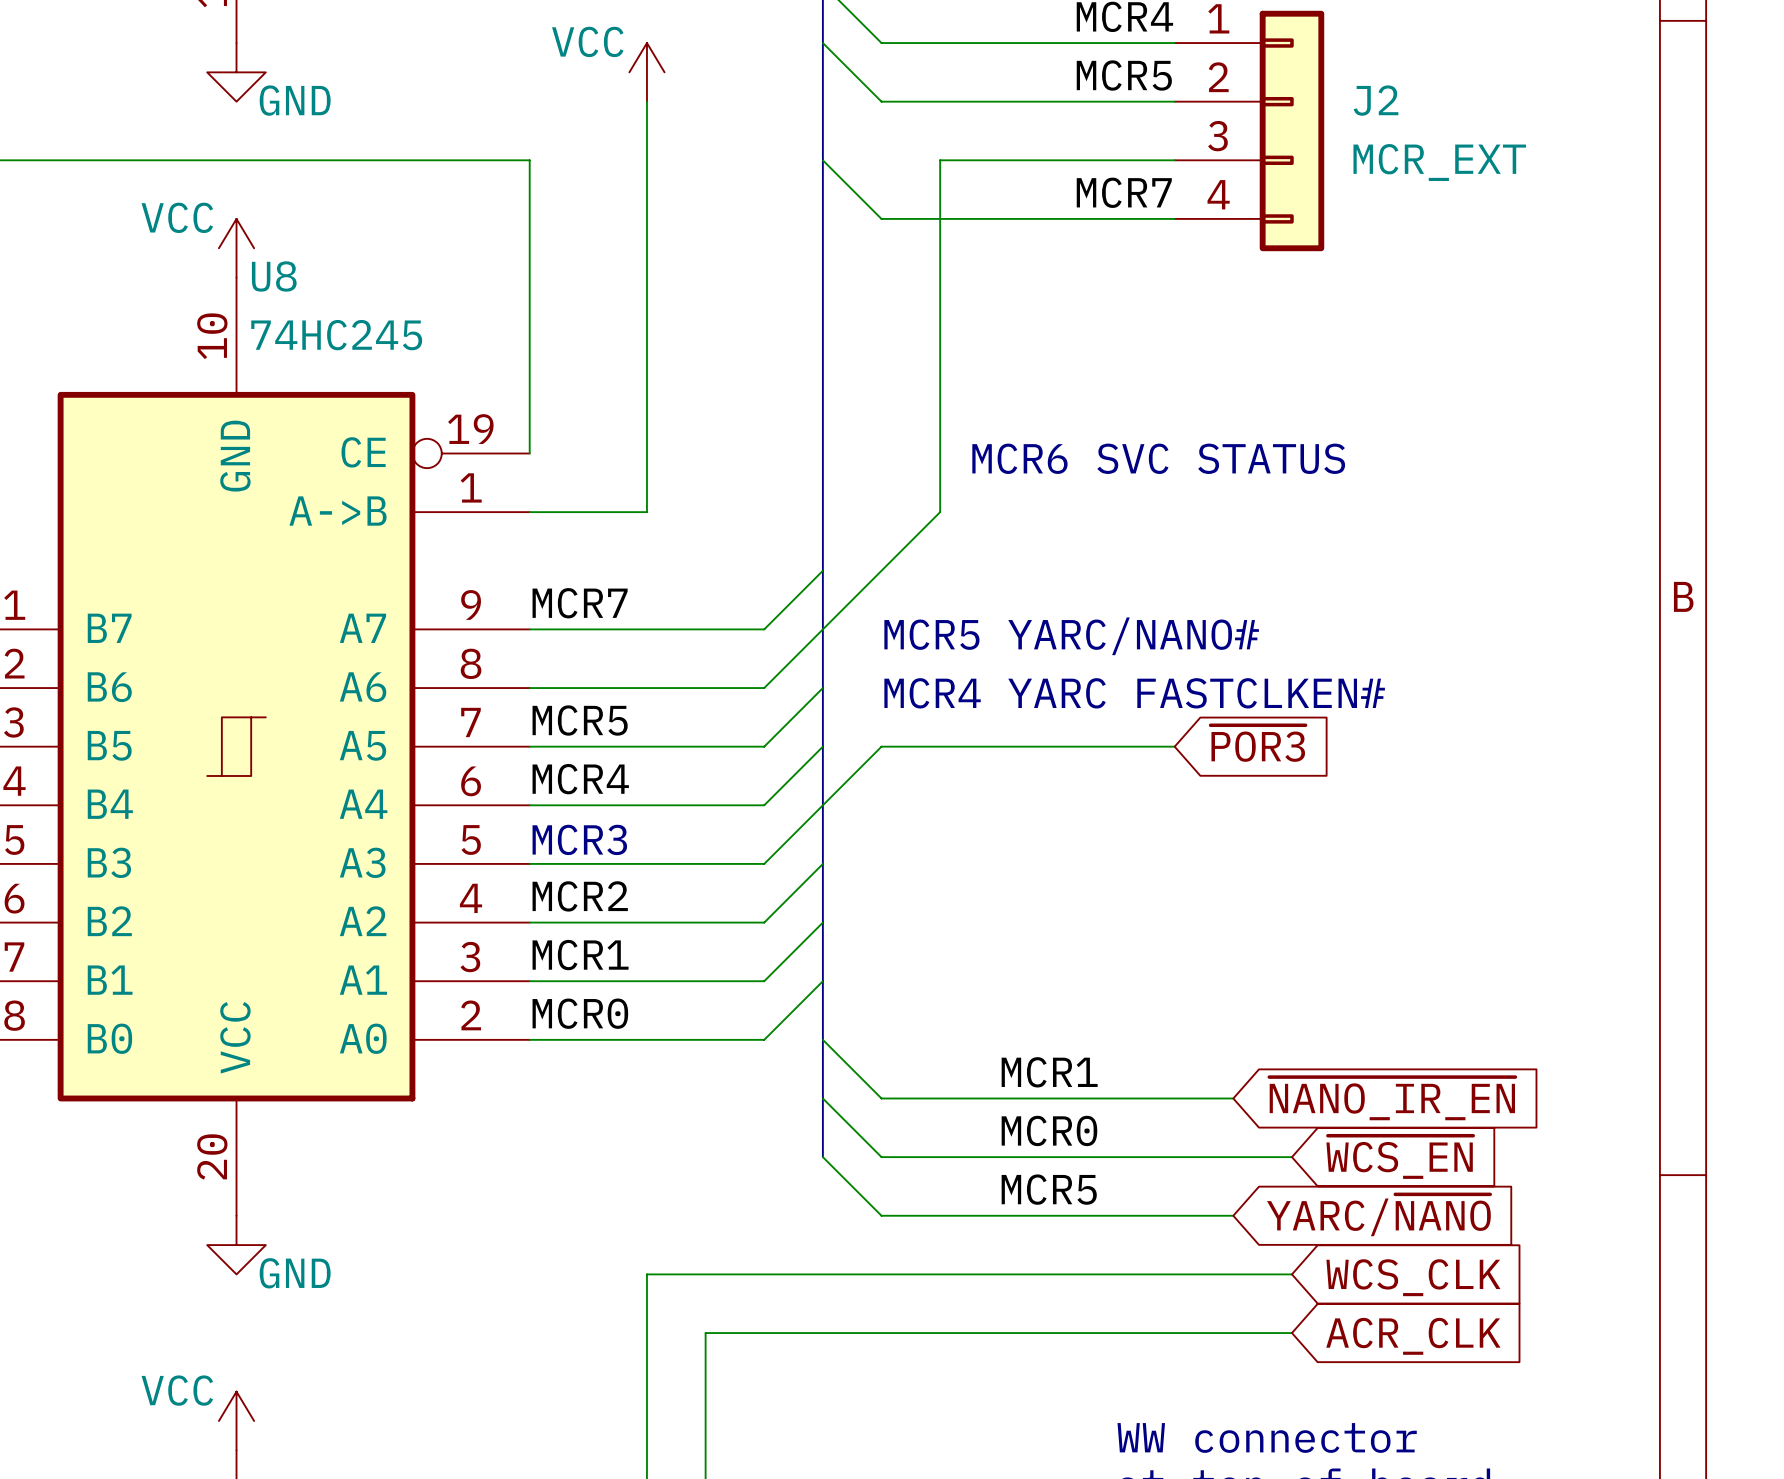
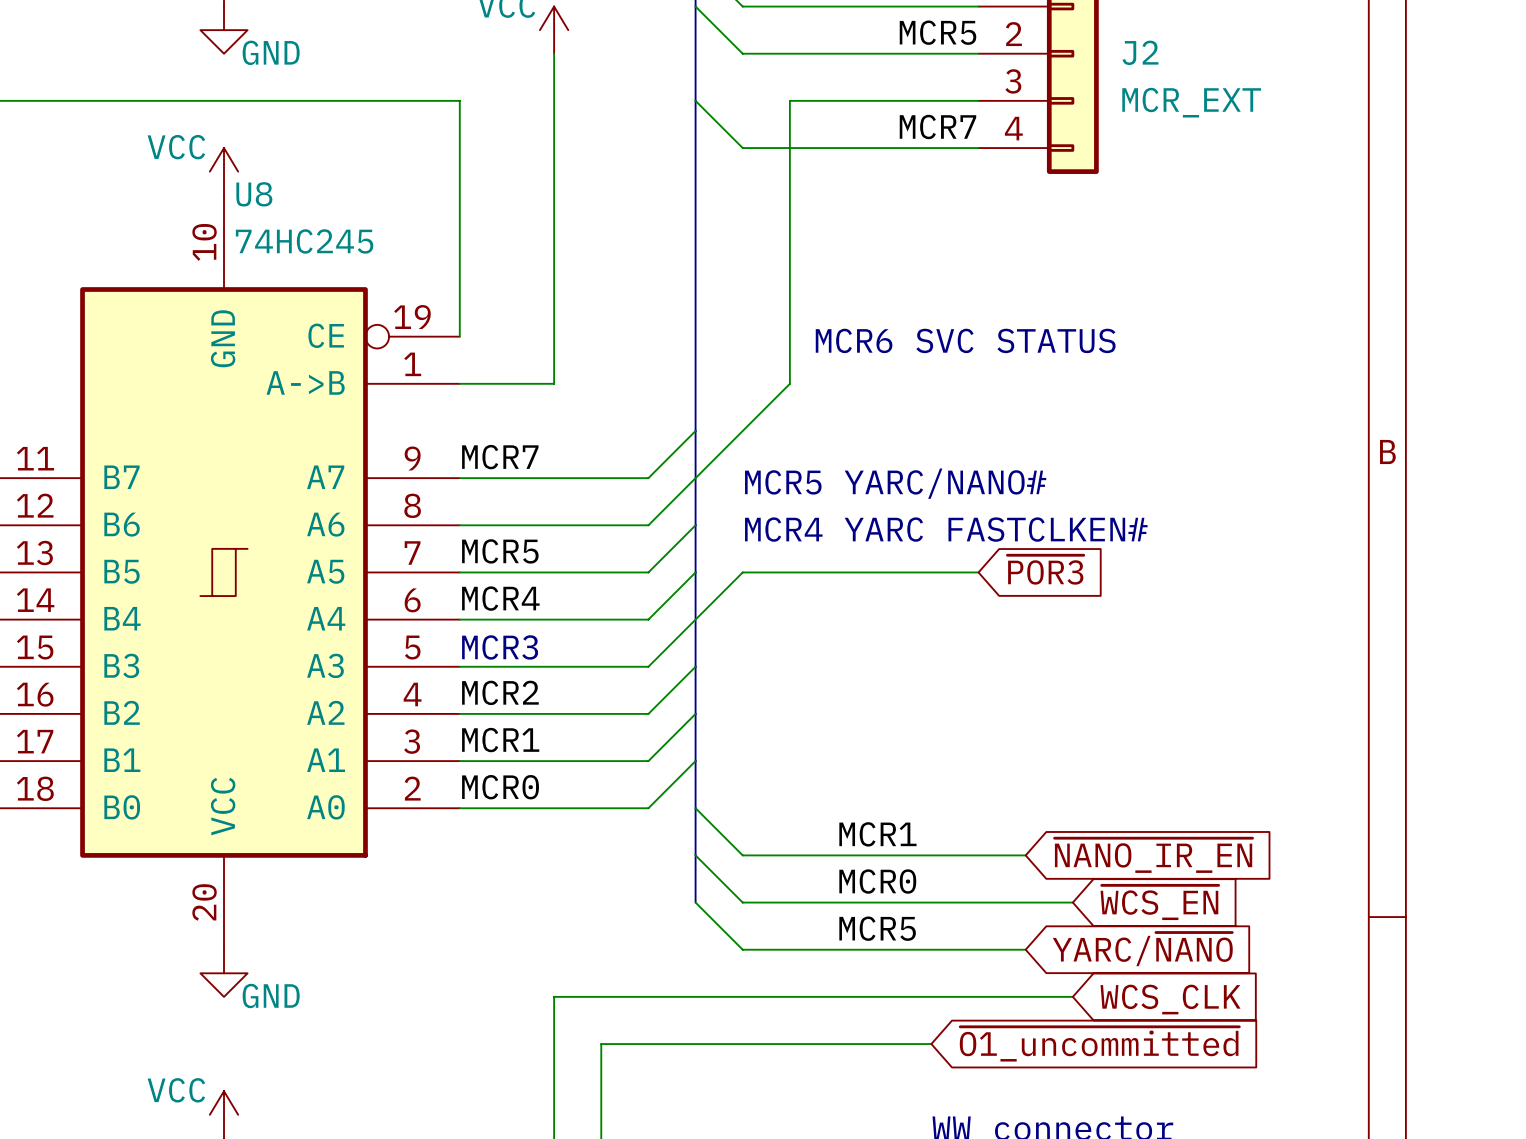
wire: (1116, 1333) (1291, 1333) -> none
global label: none -> ~{O1_uncommitted} (1099, 1044)
global label: ACR_CLK (1413, 1336) -> none

